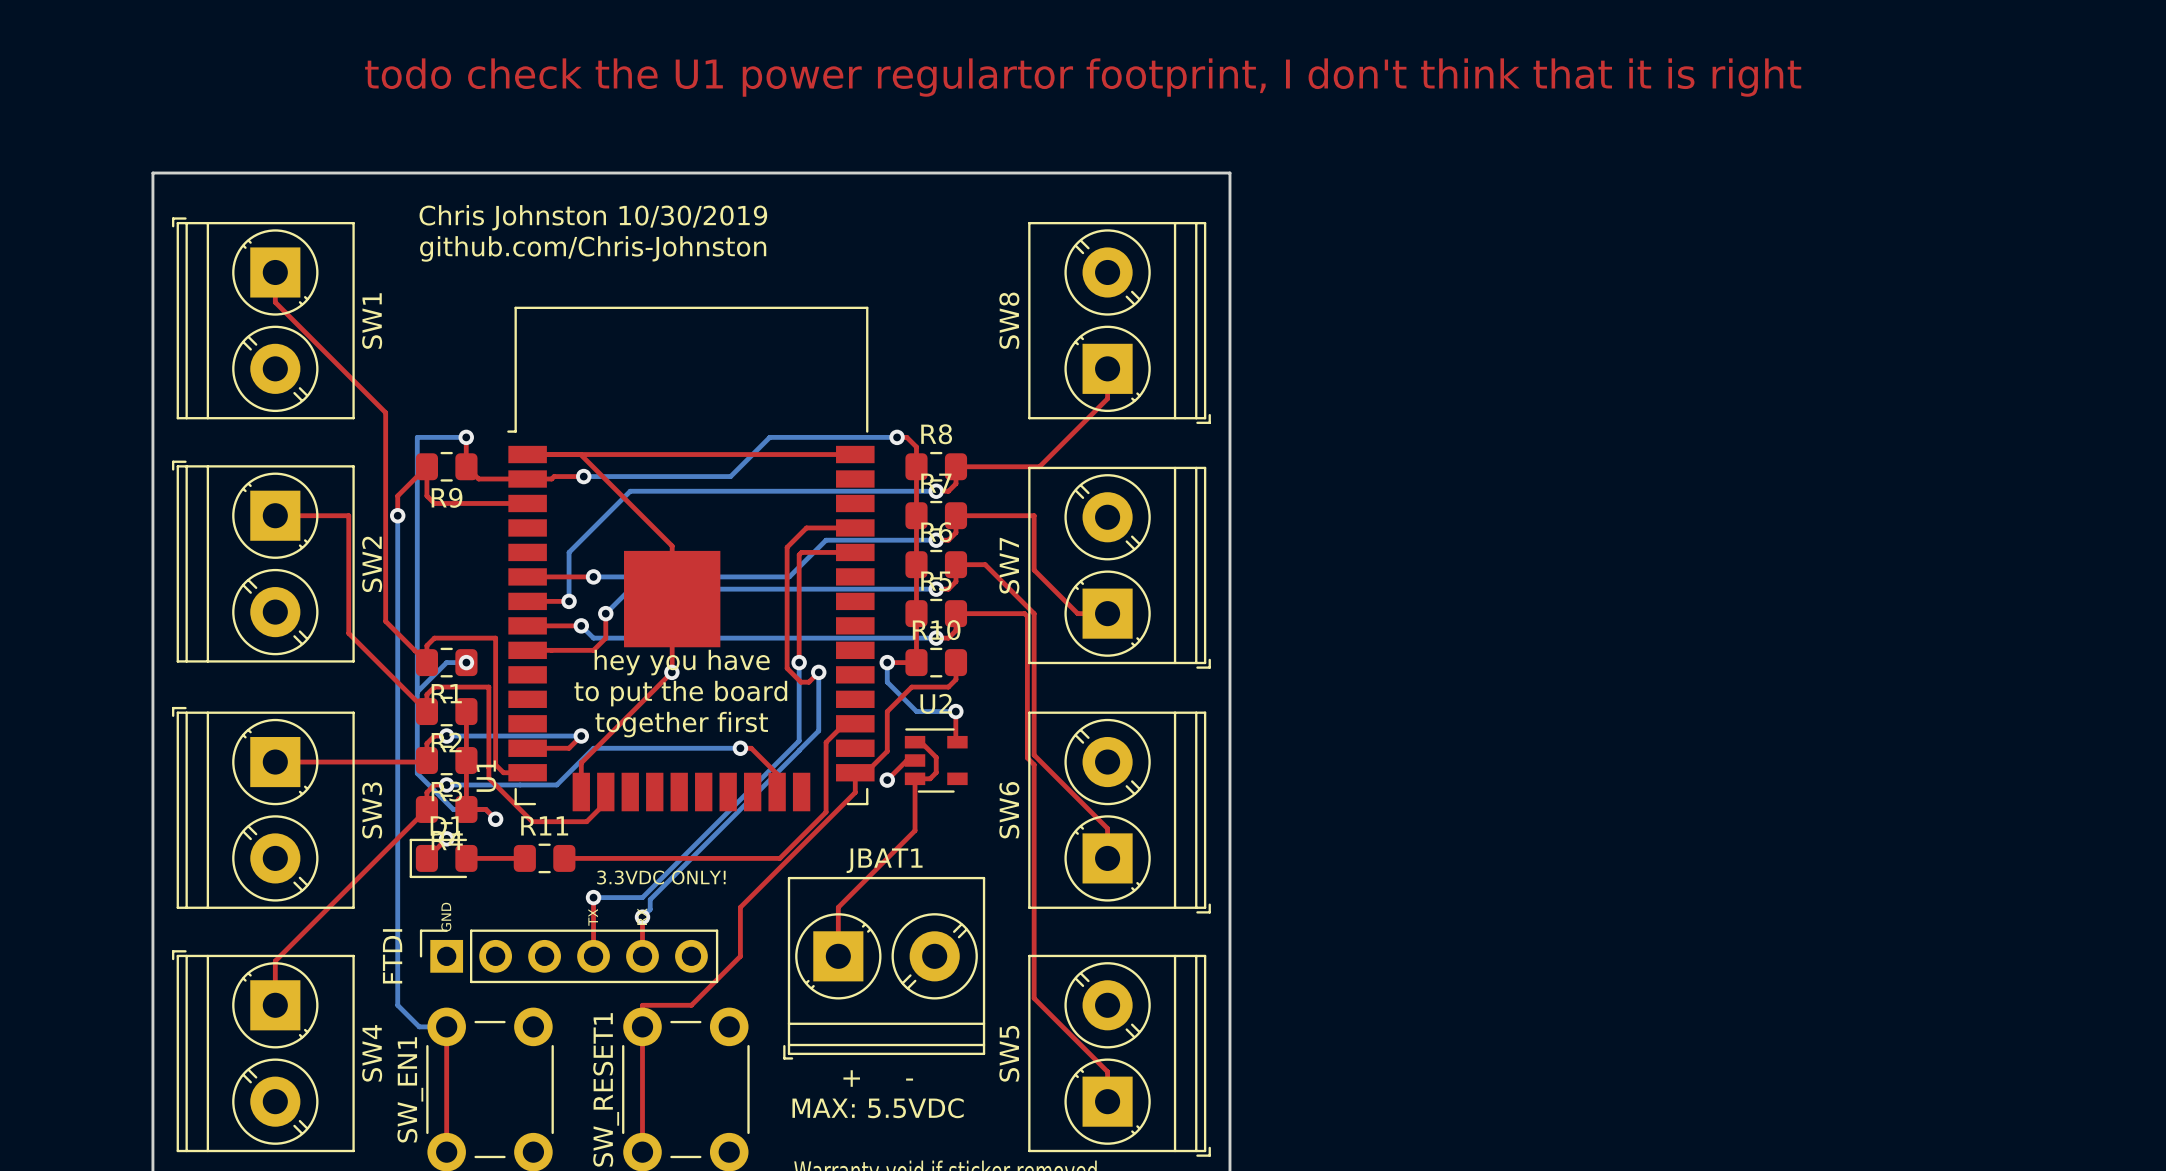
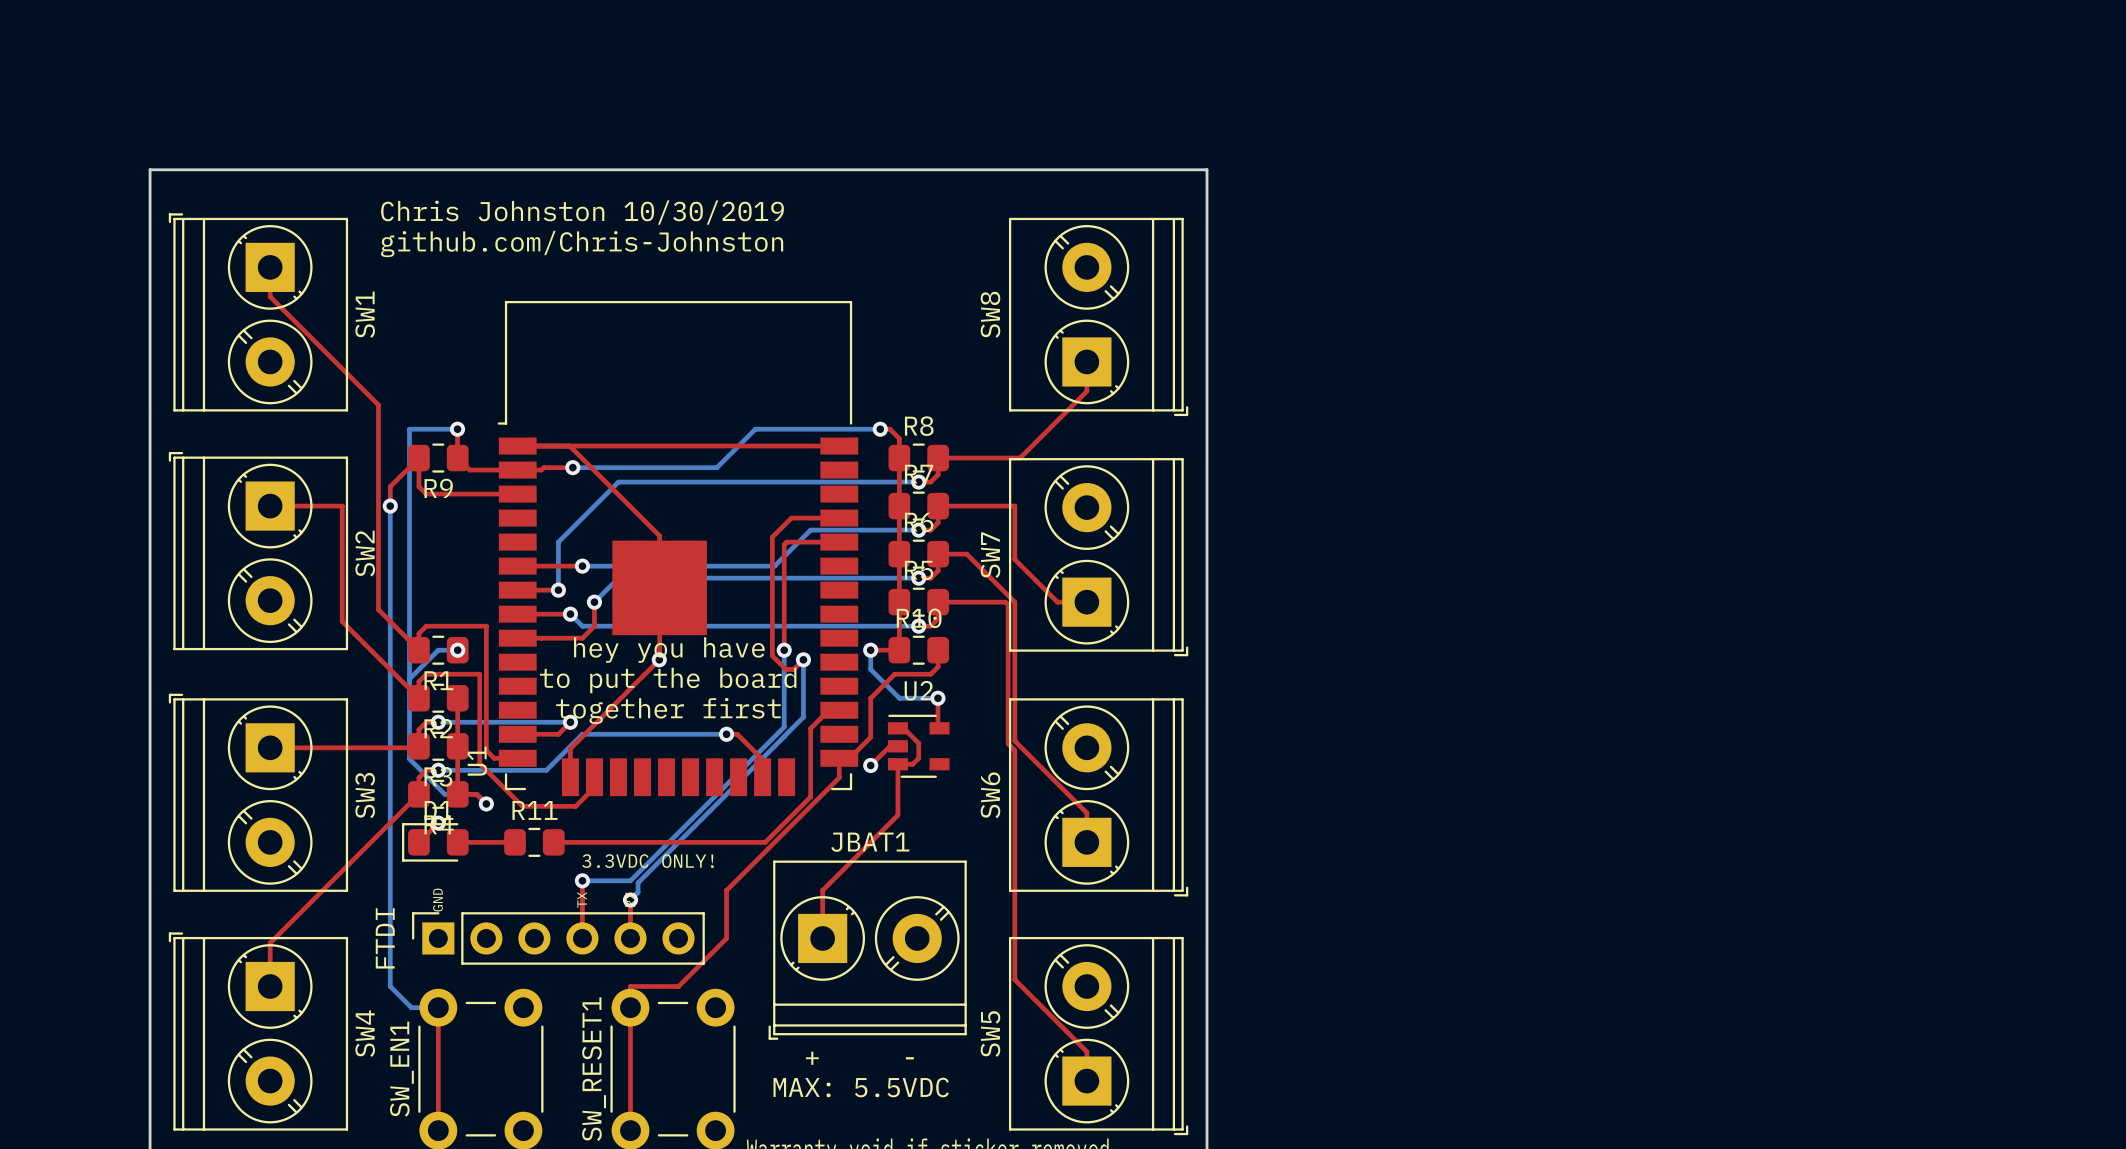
text: todo check the U1 power regulartor footprint, I don't think that it is right (1083, 77) -> none

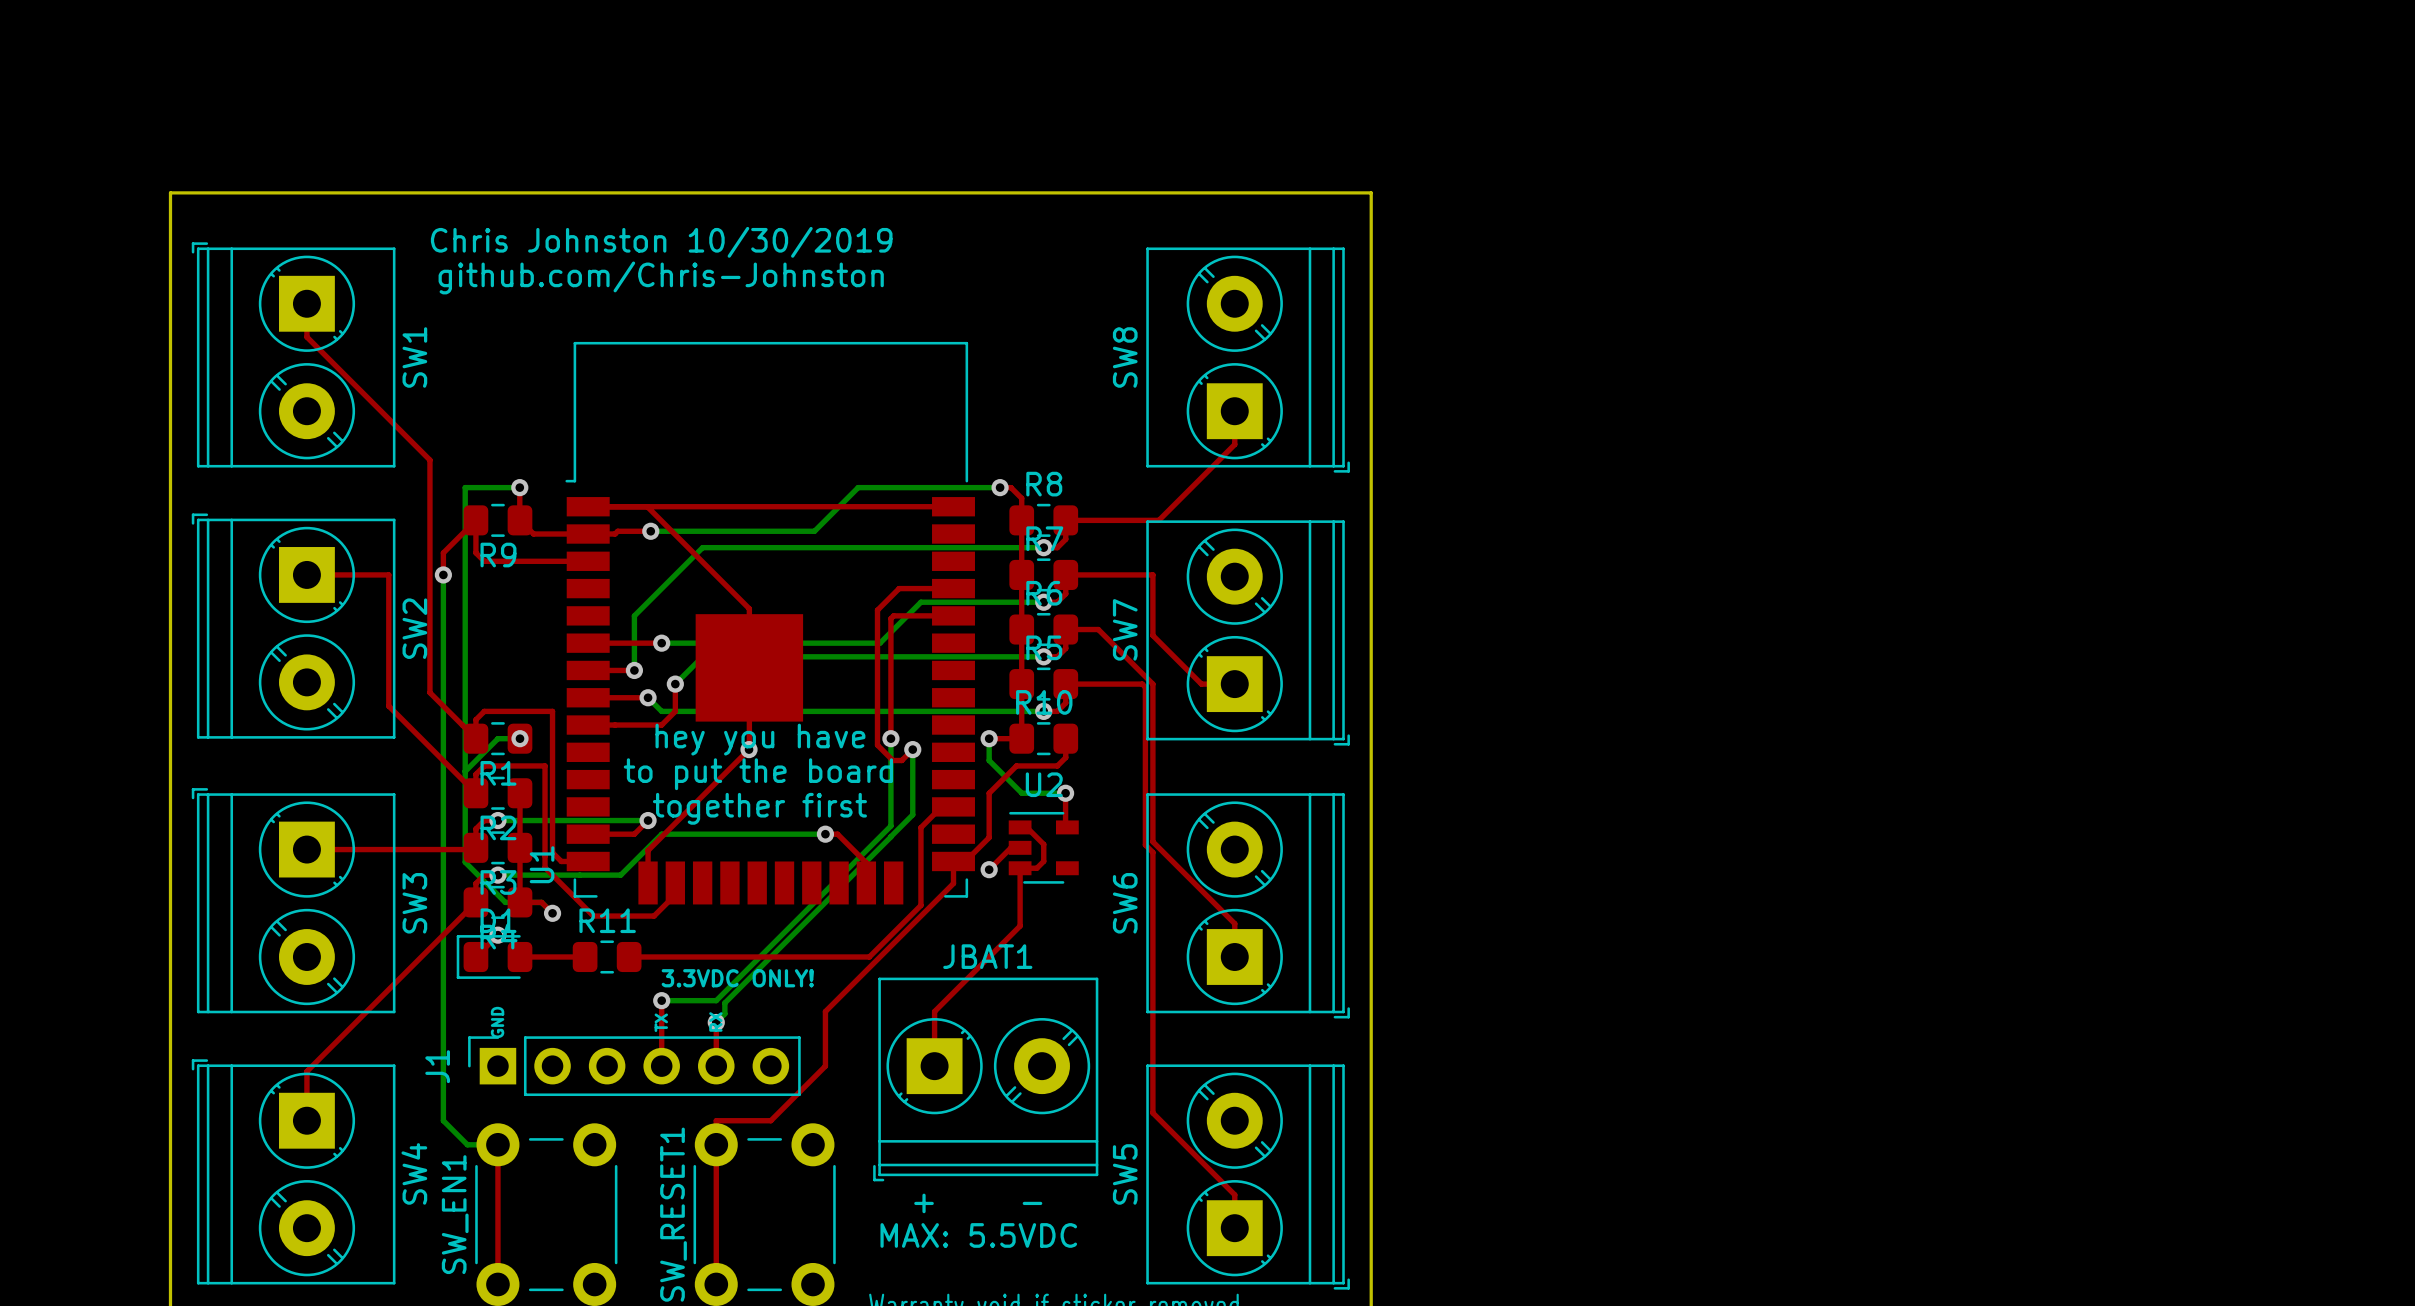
FTDI name: FTDI (385, 938) -> J1 (437, 1066)

